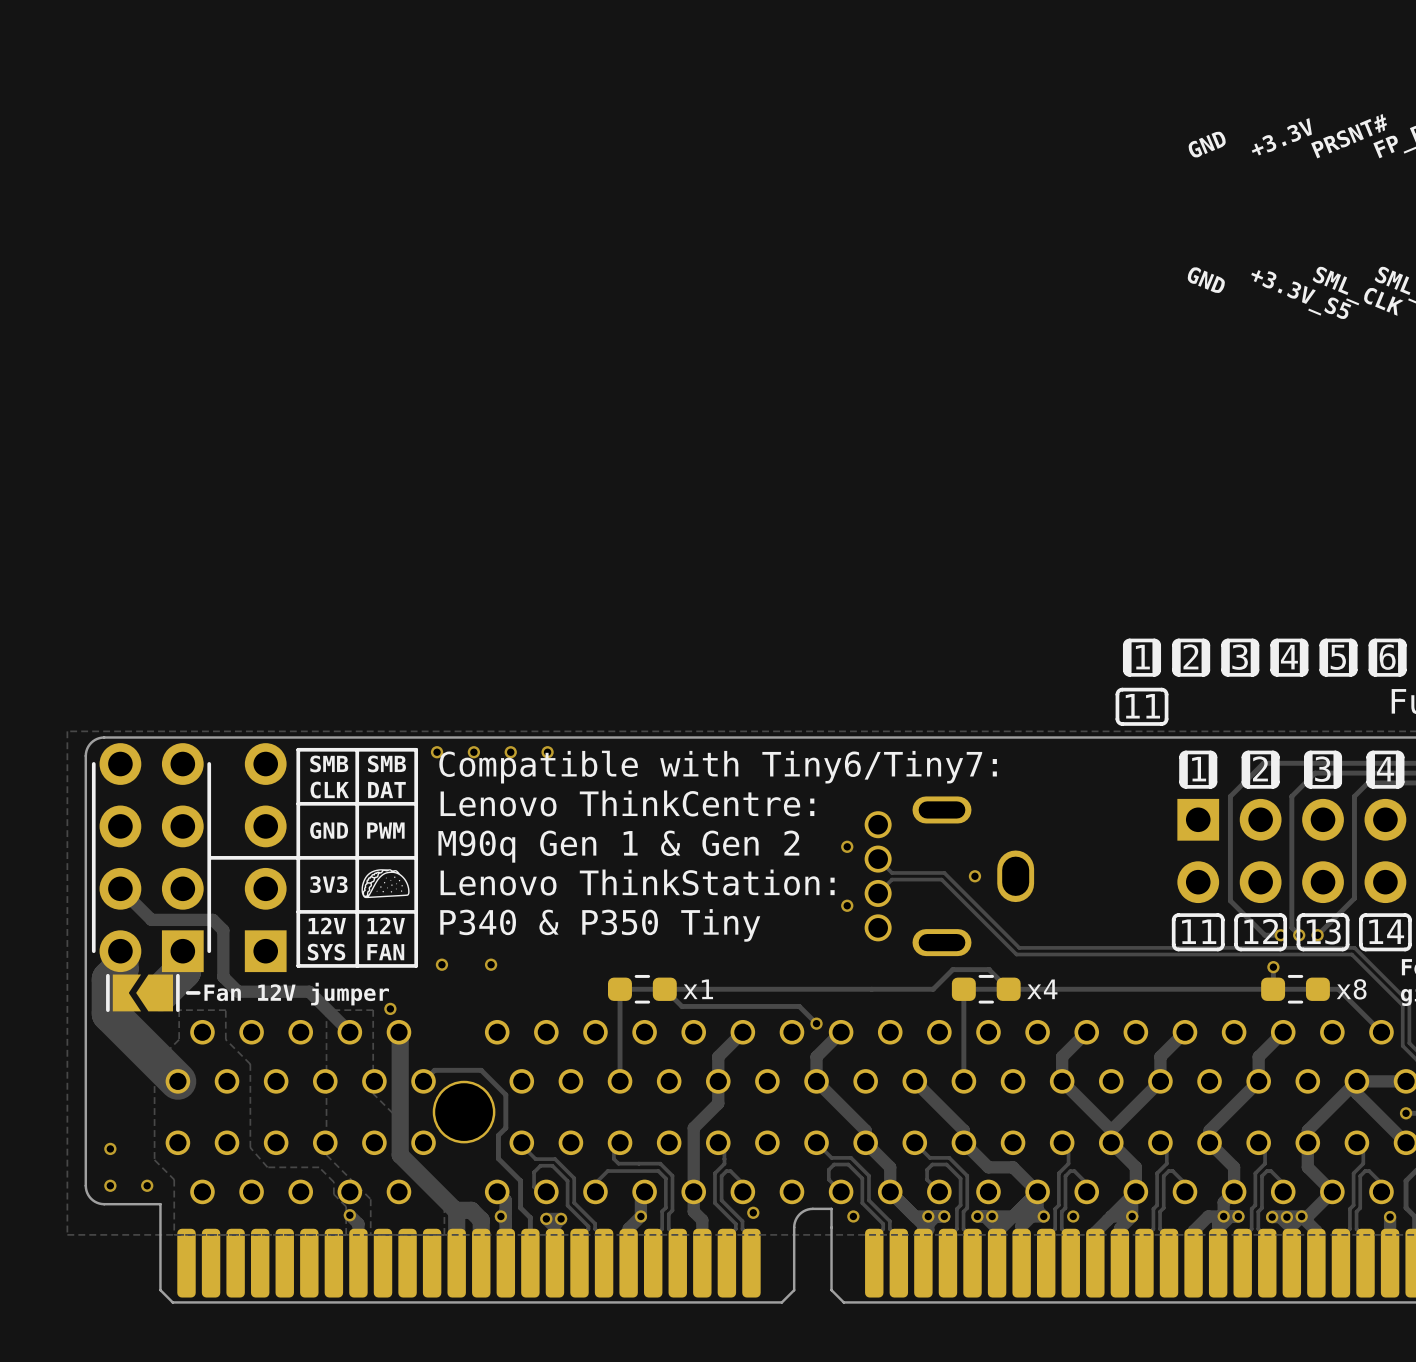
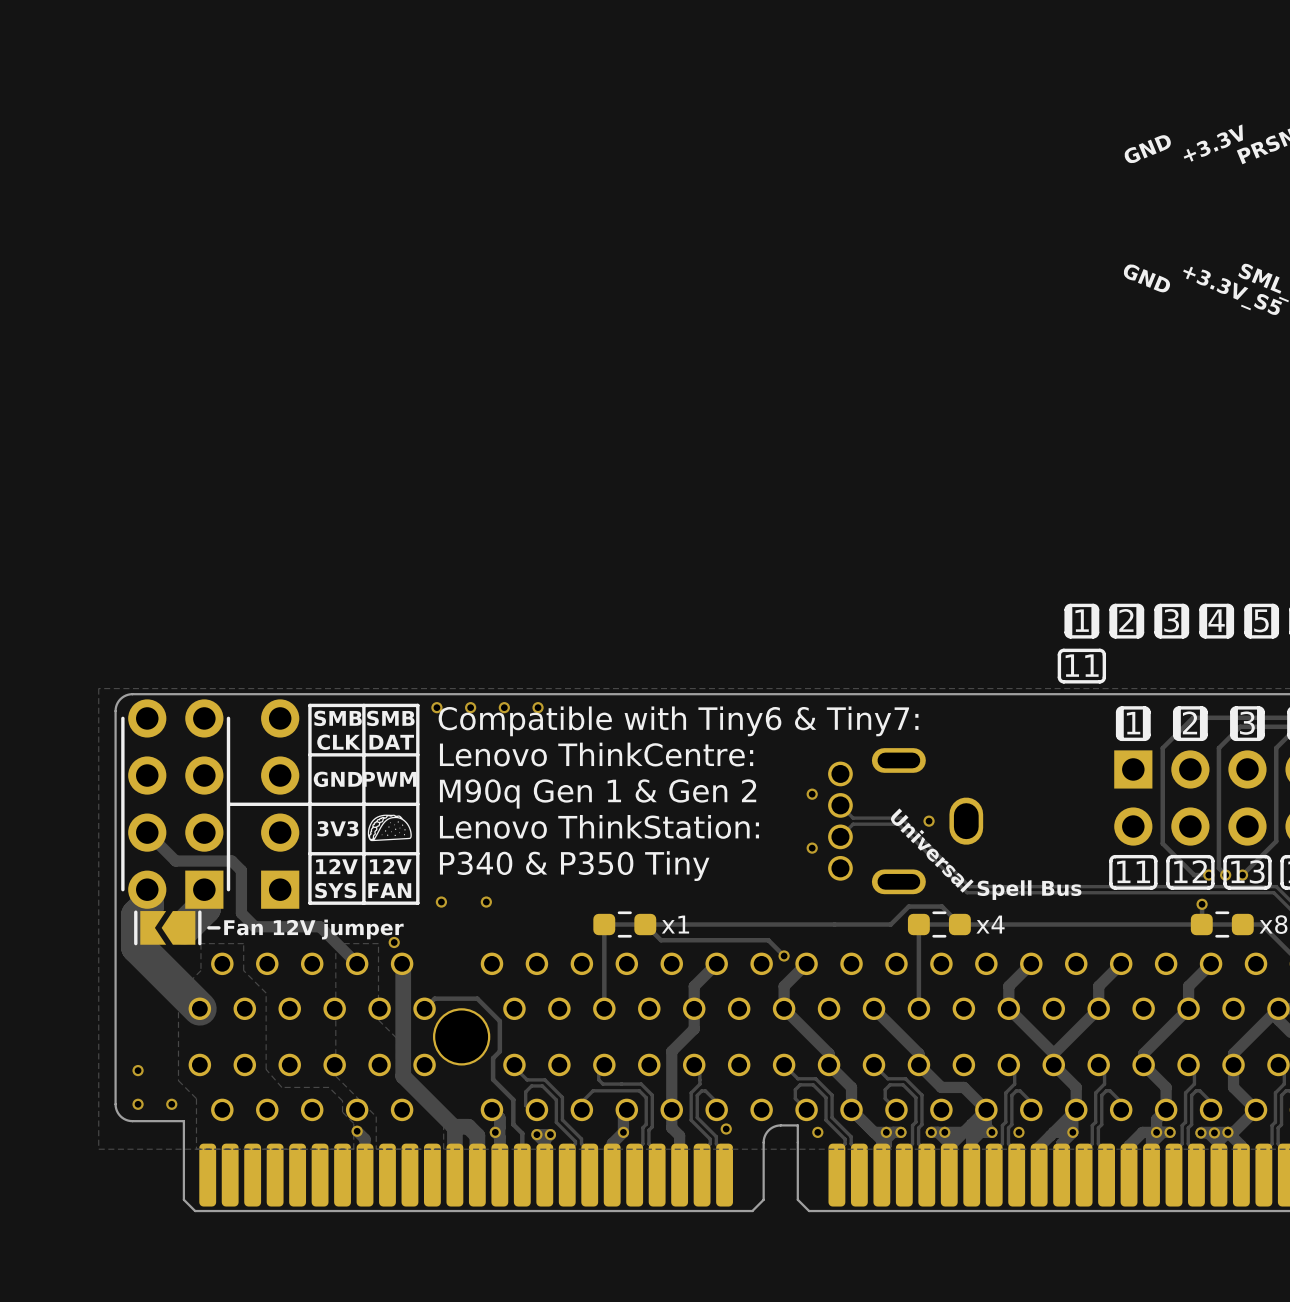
text: Compatible with Tiny6/Tiny7: (718, 767) -> Compatible with Tiny6 & Tiny7: (678, 721)
text: none -> Universal (932, 850)
text: none -> Spell Bus (1029, 890)

